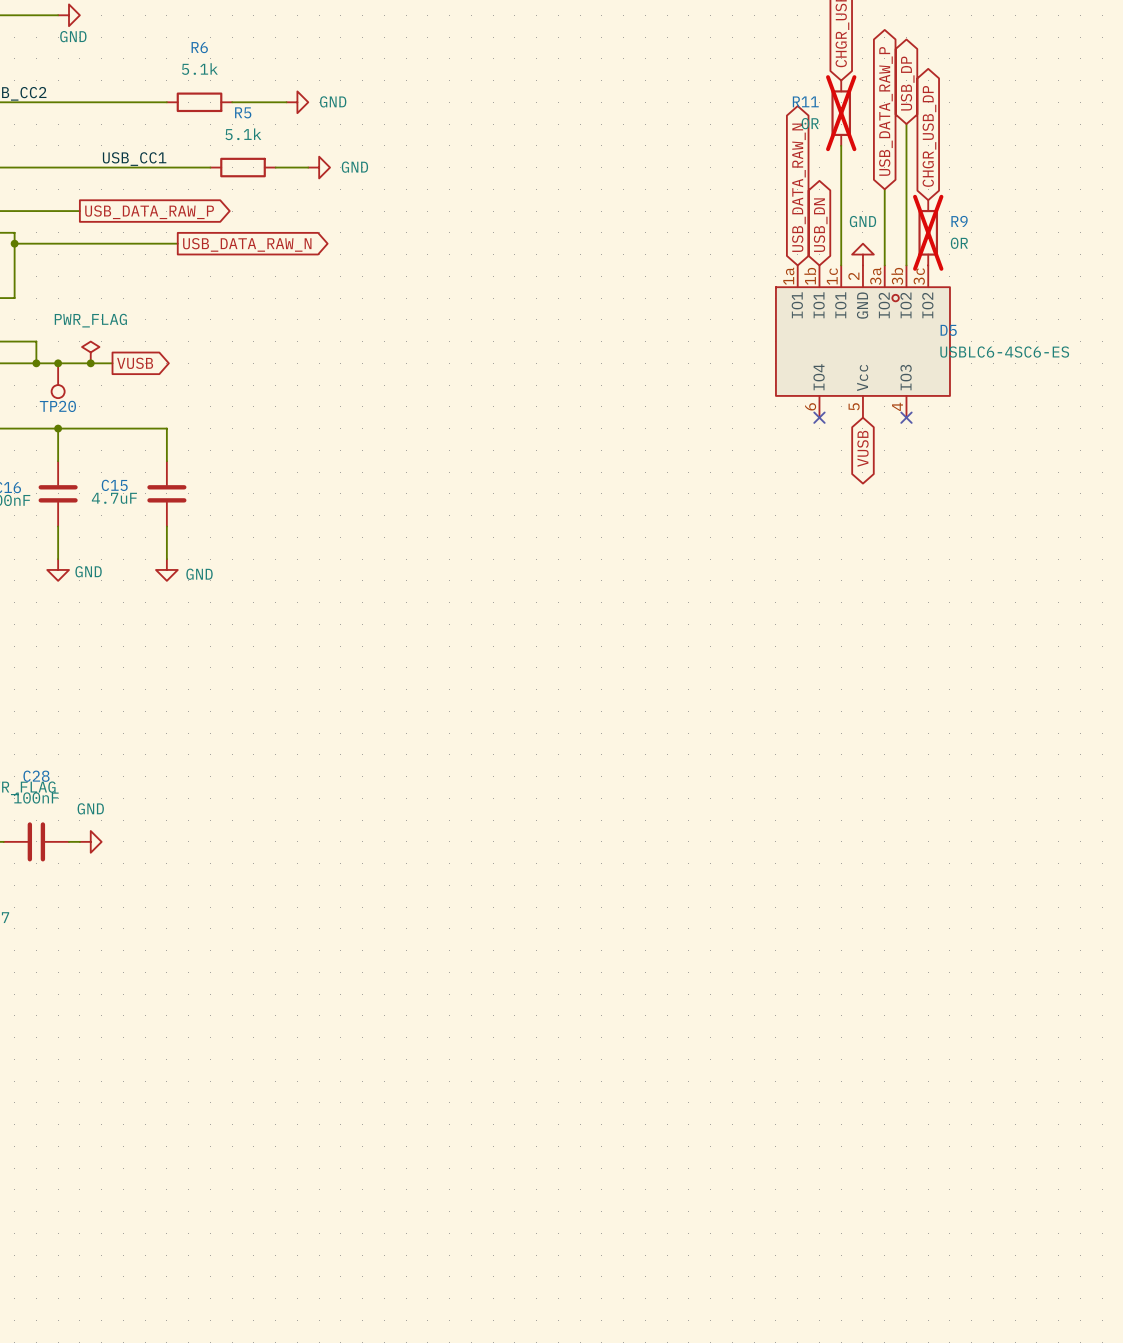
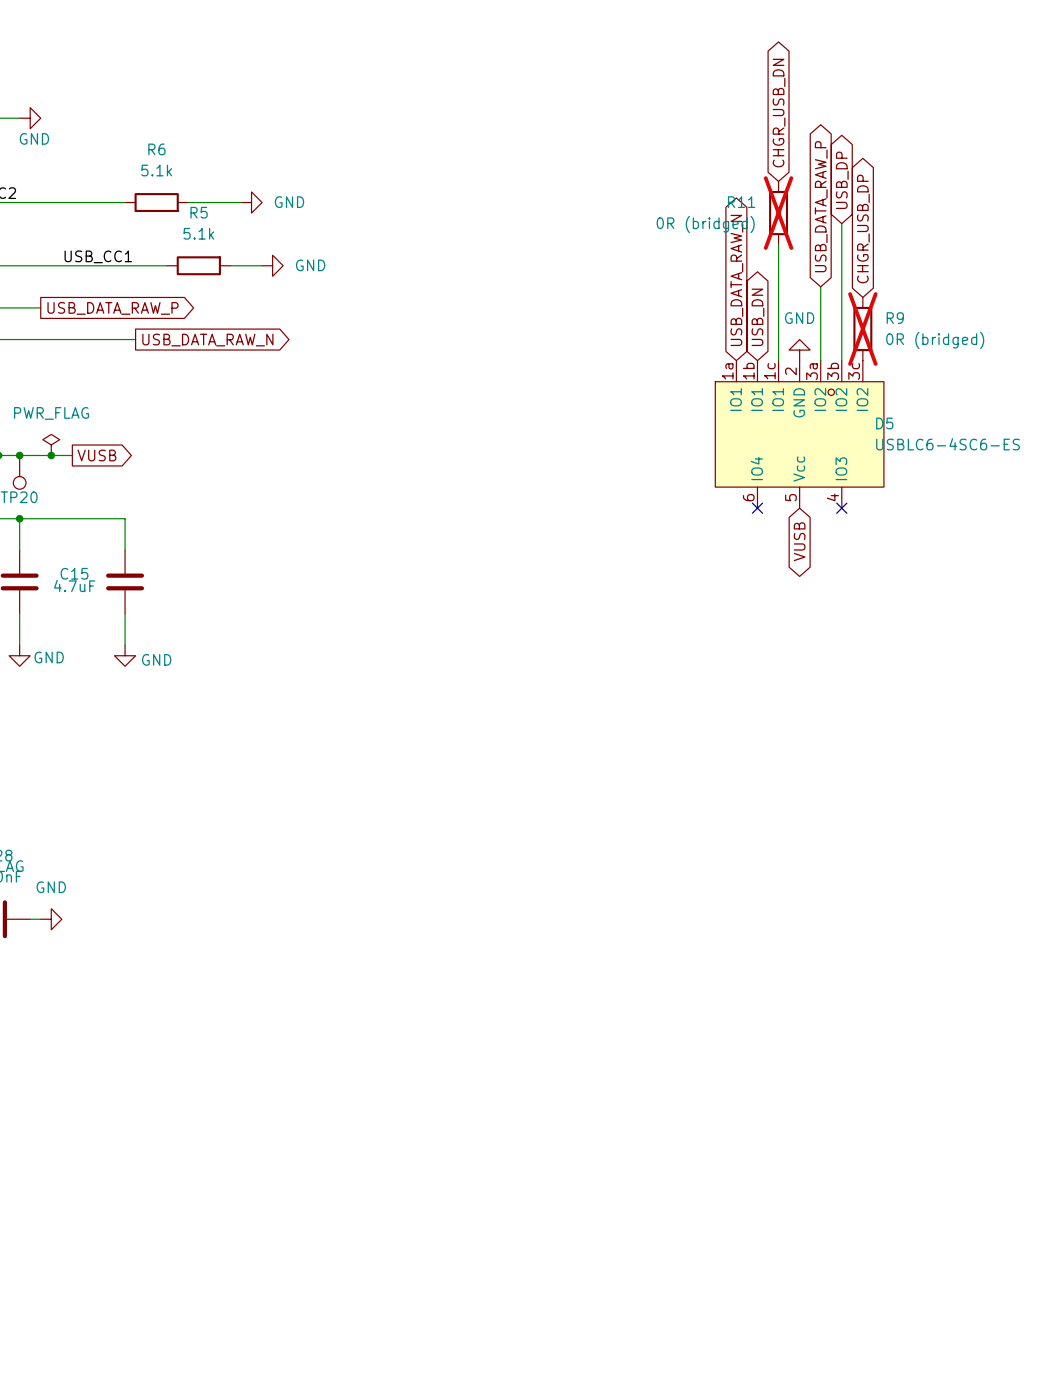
R11 value: 0R (810, 123) -> 0R (bridged) (705, 224)
R9 value: 0R (959, 243) -> 0R (bridged) (935, 340)

